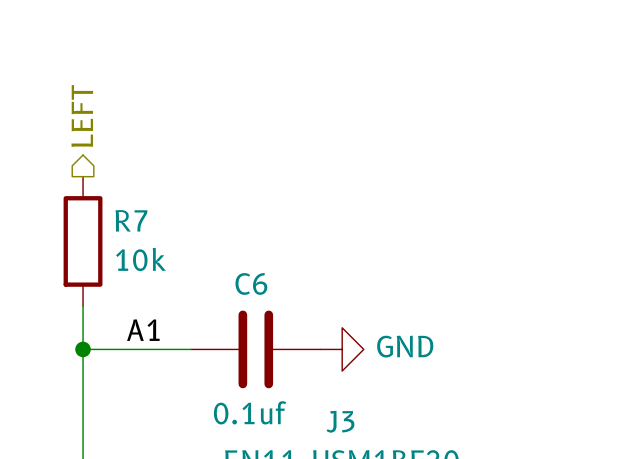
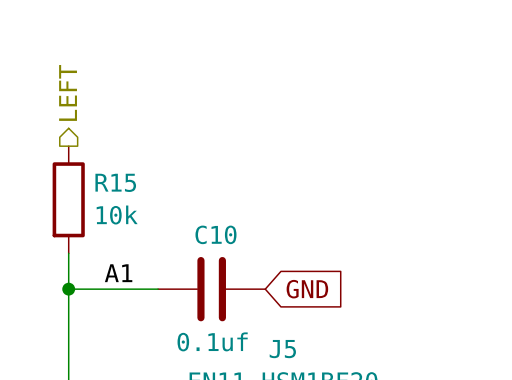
R7 name: R7 (131, 220) -> R15 (115, 182)
C6 name: C6 (251, 283) -> C10 (215, 234)
power symbol: GND (342, 349) -> none
global label: none -> GND (307, 289)
J3 name: J3 (340, 421) -> J5 (282, 349)

